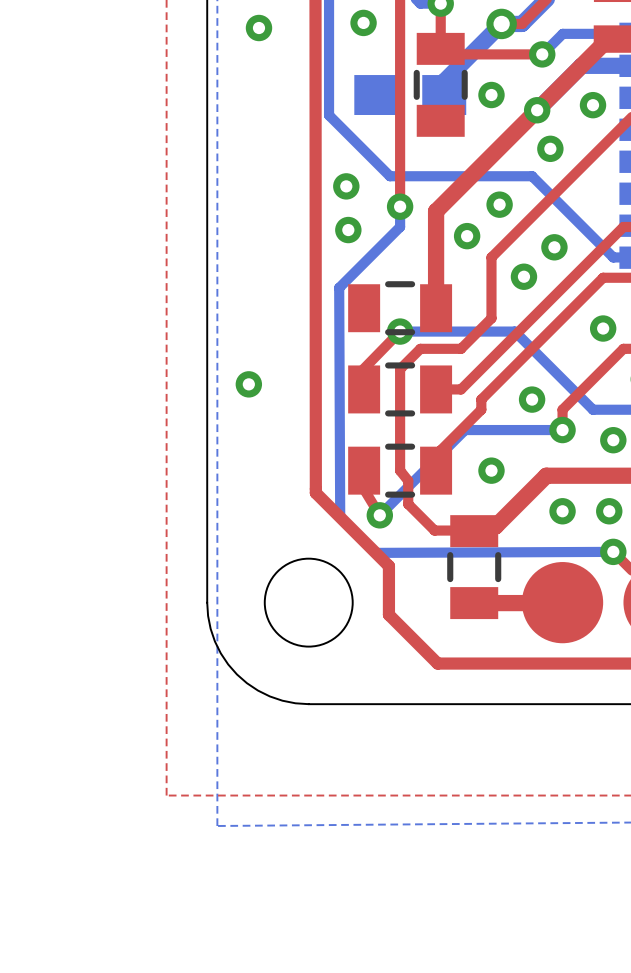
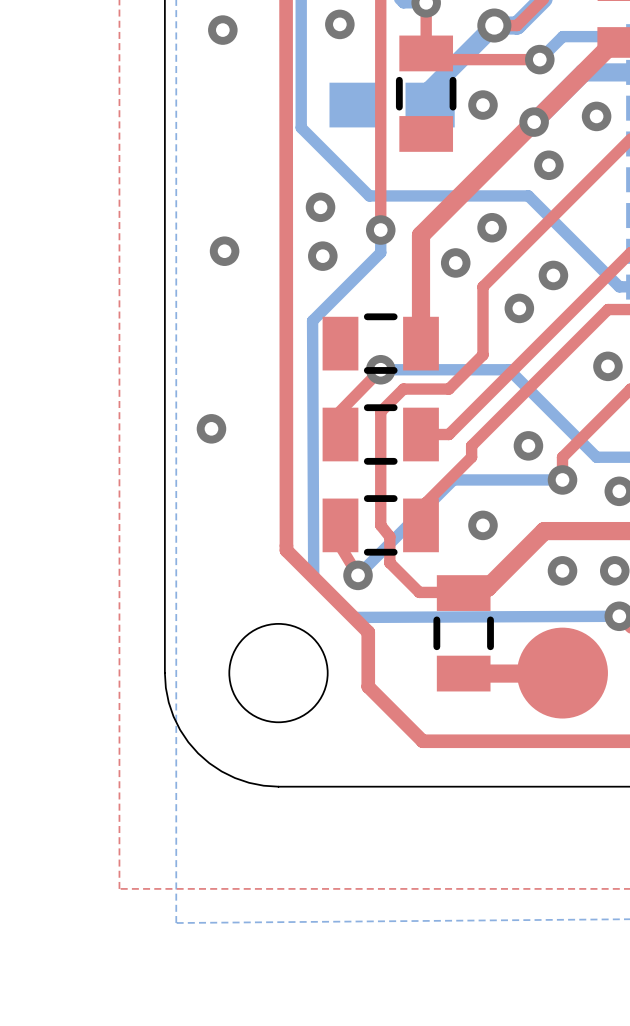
via: none -> (224, 251)

